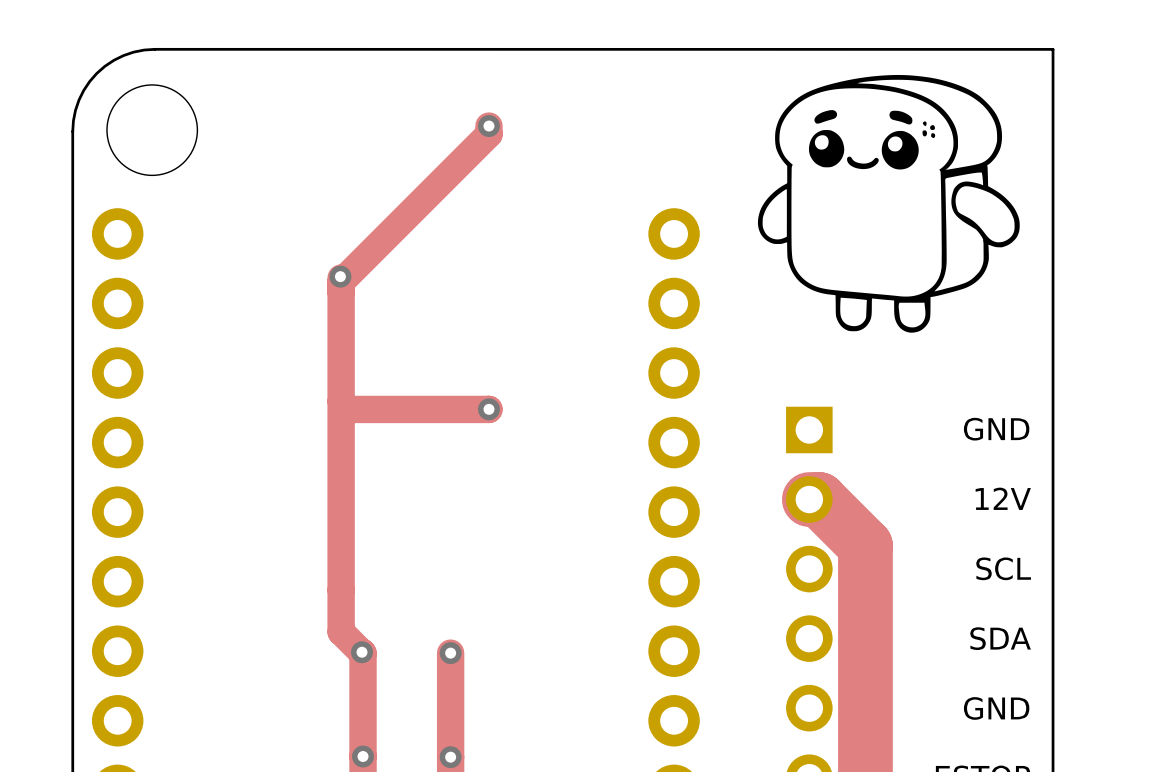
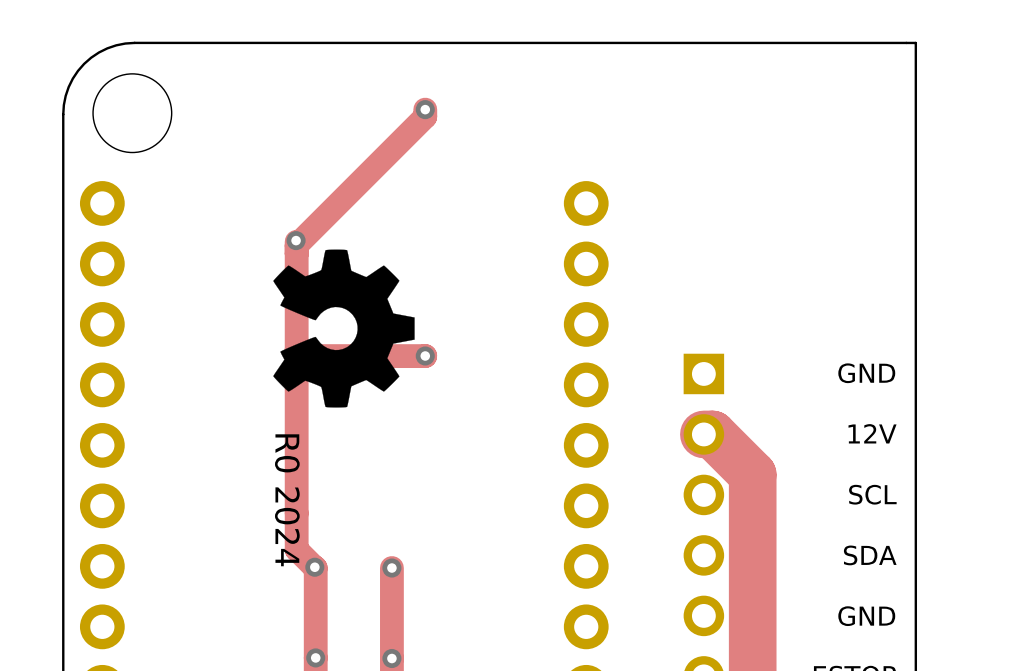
drawing: [757, 74, 1020, 333] -> none
drawing: none -> [273, 249, 415, 408]
text: none -> R0 2024 (287, 500)

